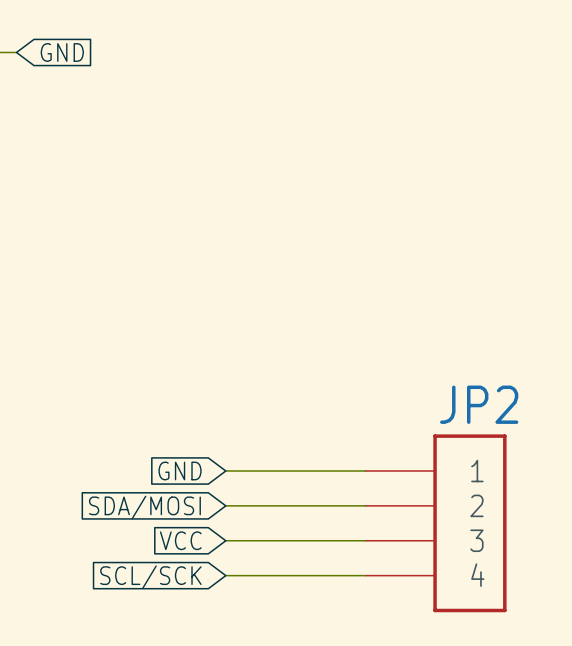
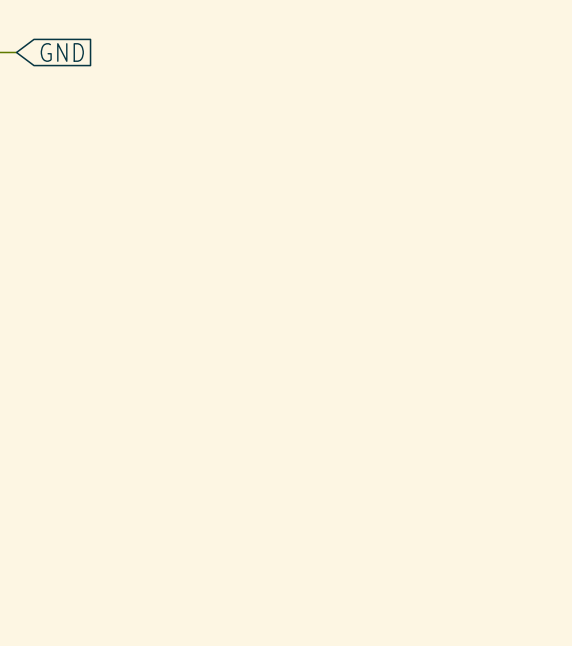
global label: GND (180, 471) -> none
wire: (225, 471) (365, 471) -> none
wire: (225, 505) (365, 505) -> none
global label: SDA/MOSI (144, 507) -> none
JP2: (435, 523) -> none
global label: VCC (180, 540) -> none
wire: (225, 540) (365, 540) -> none
wire: (225, 575) (365, 575) -> none
global label: SCL/SCK (150, 577) -> none

